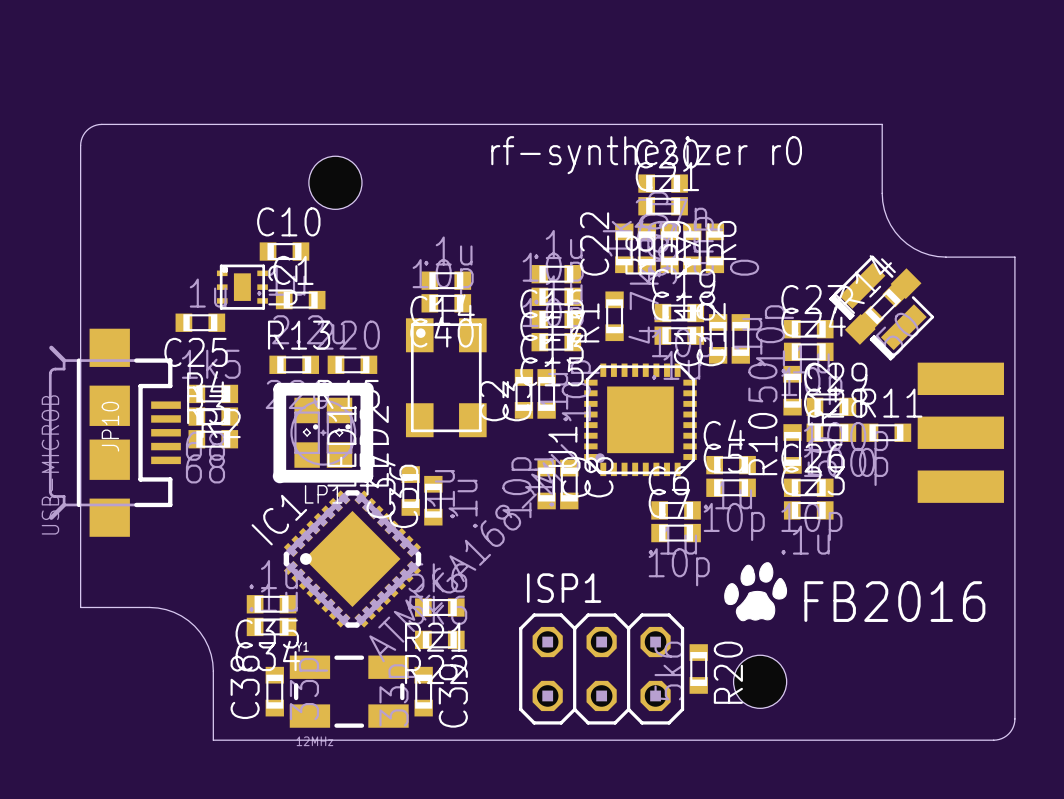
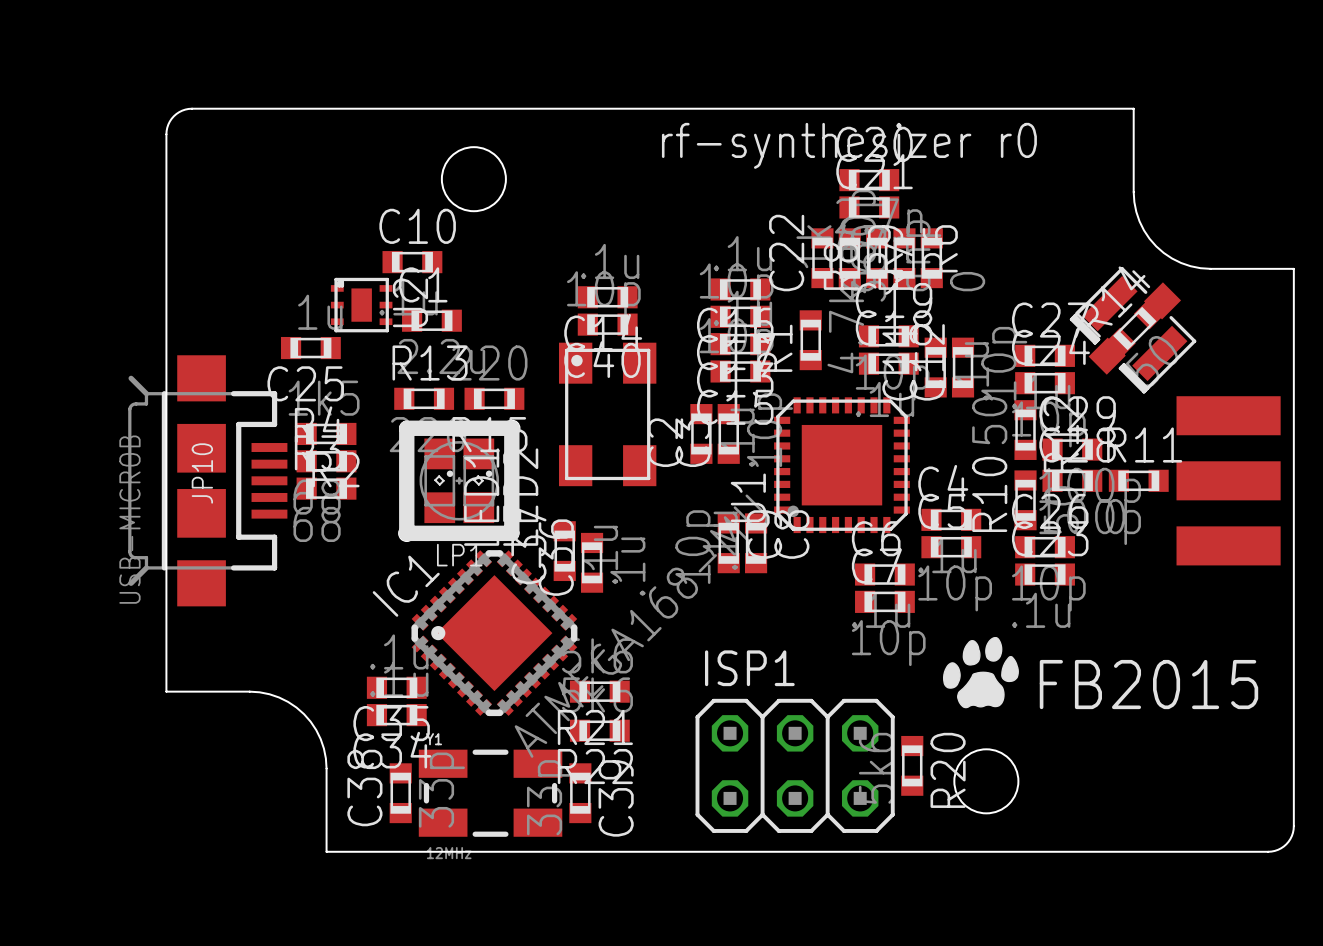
text: FB2016 (894, 601) -> FB2015 (1148, 684)

